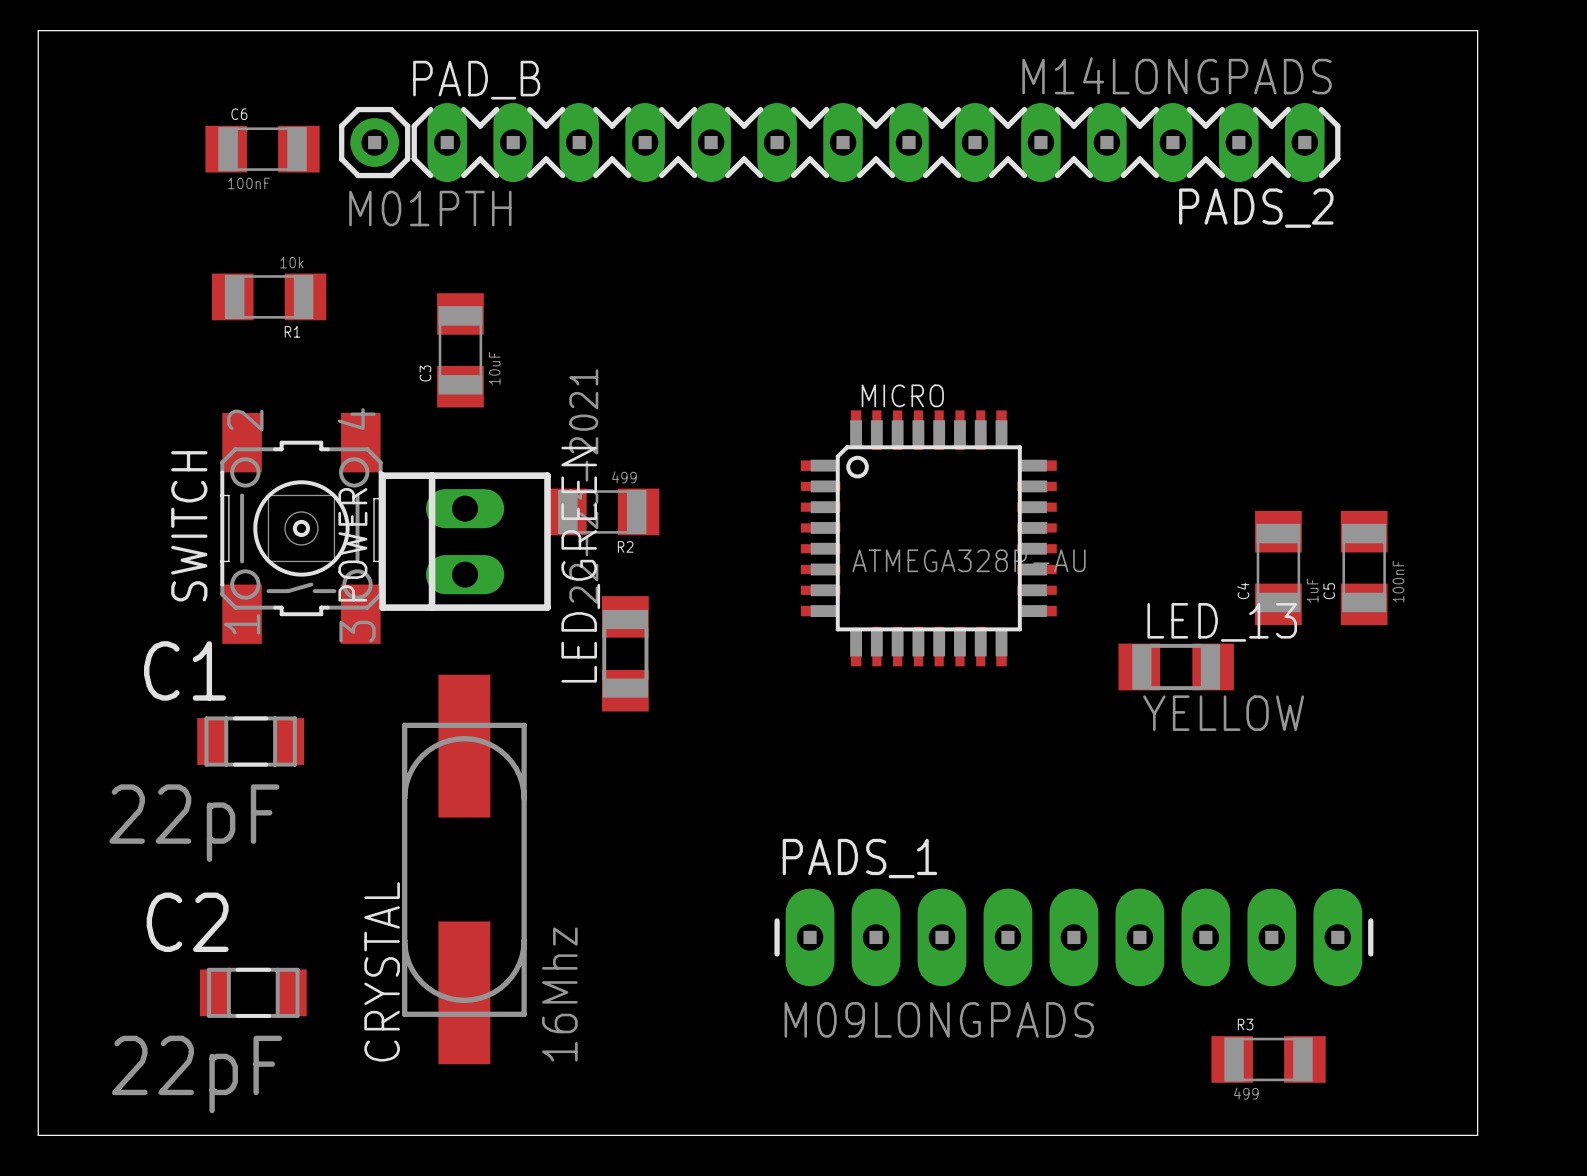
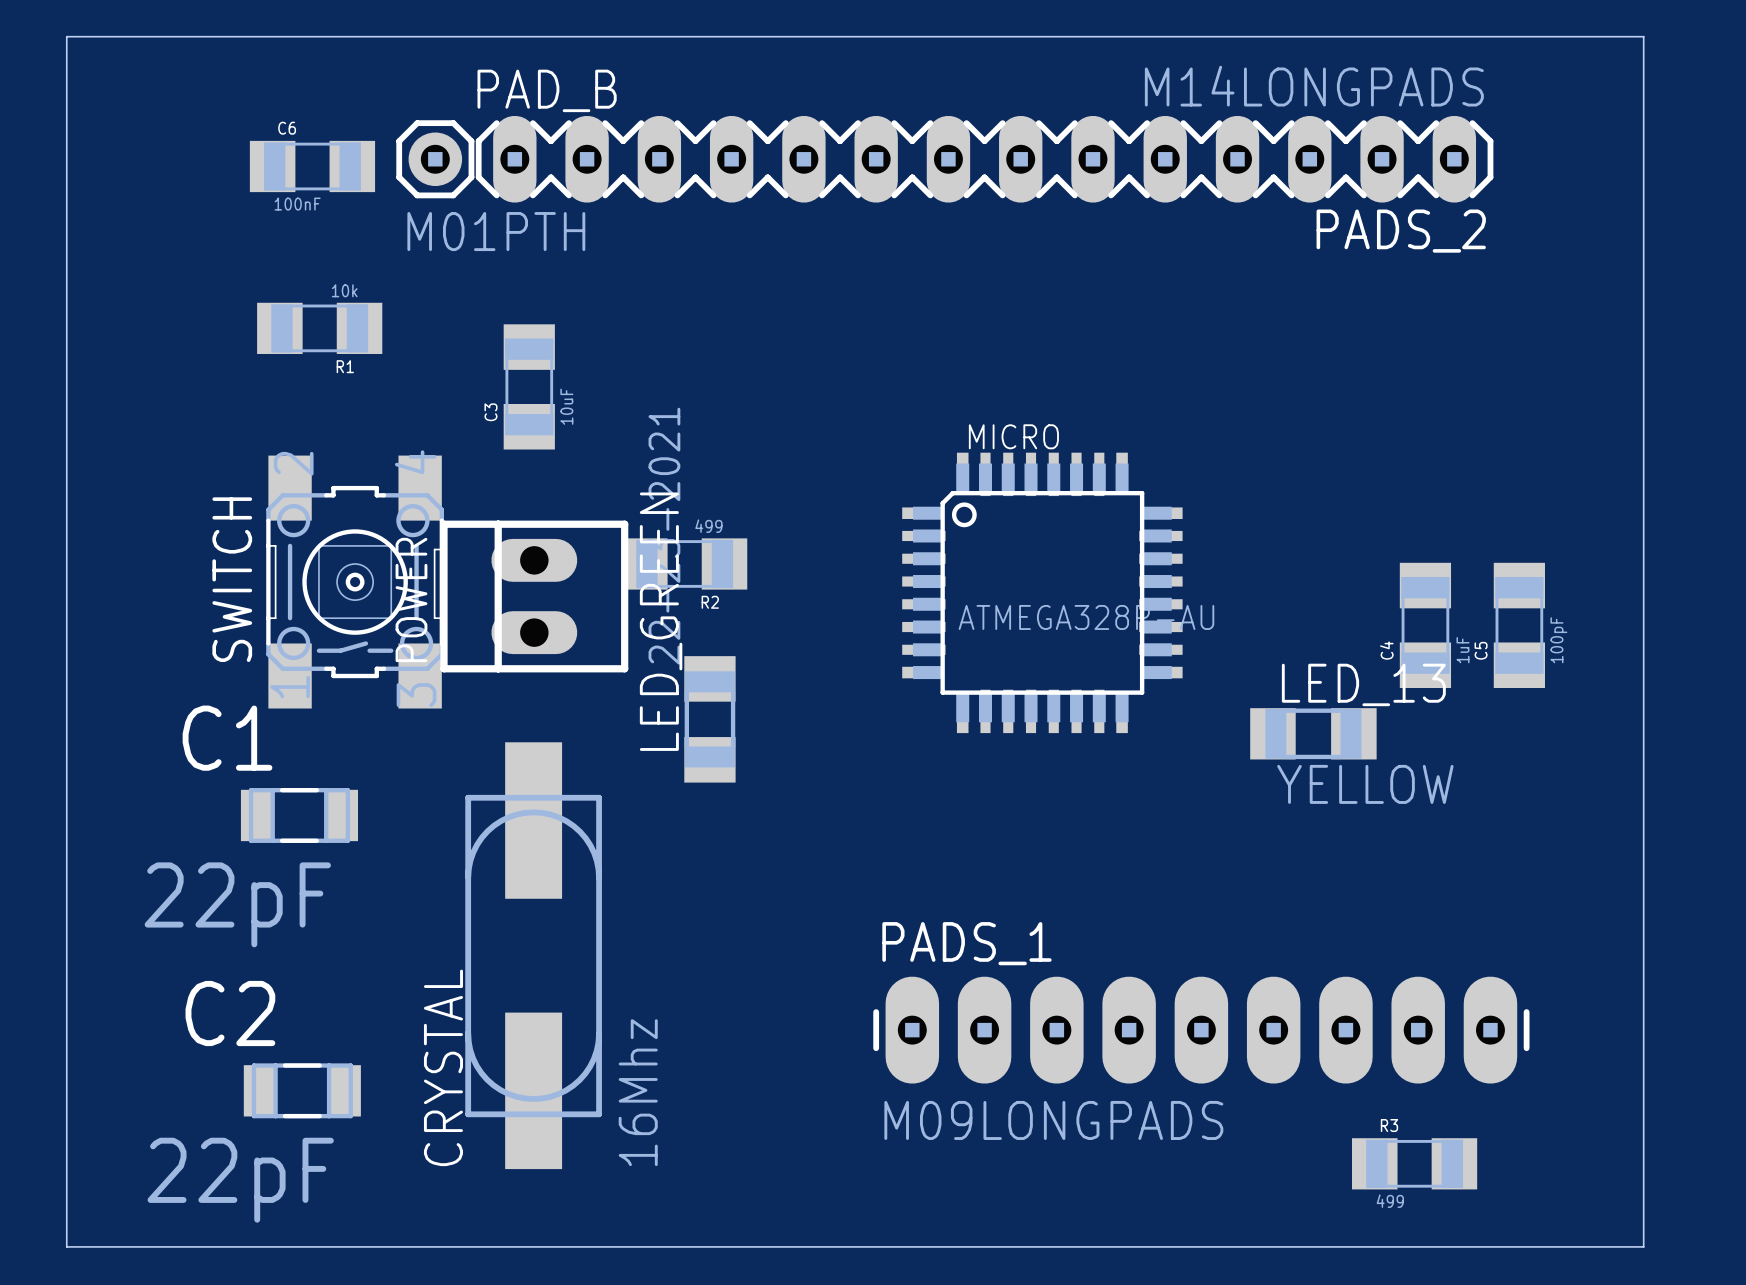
C5 value: 100nF (1398, 581) -> 100pF (1558, 640)

